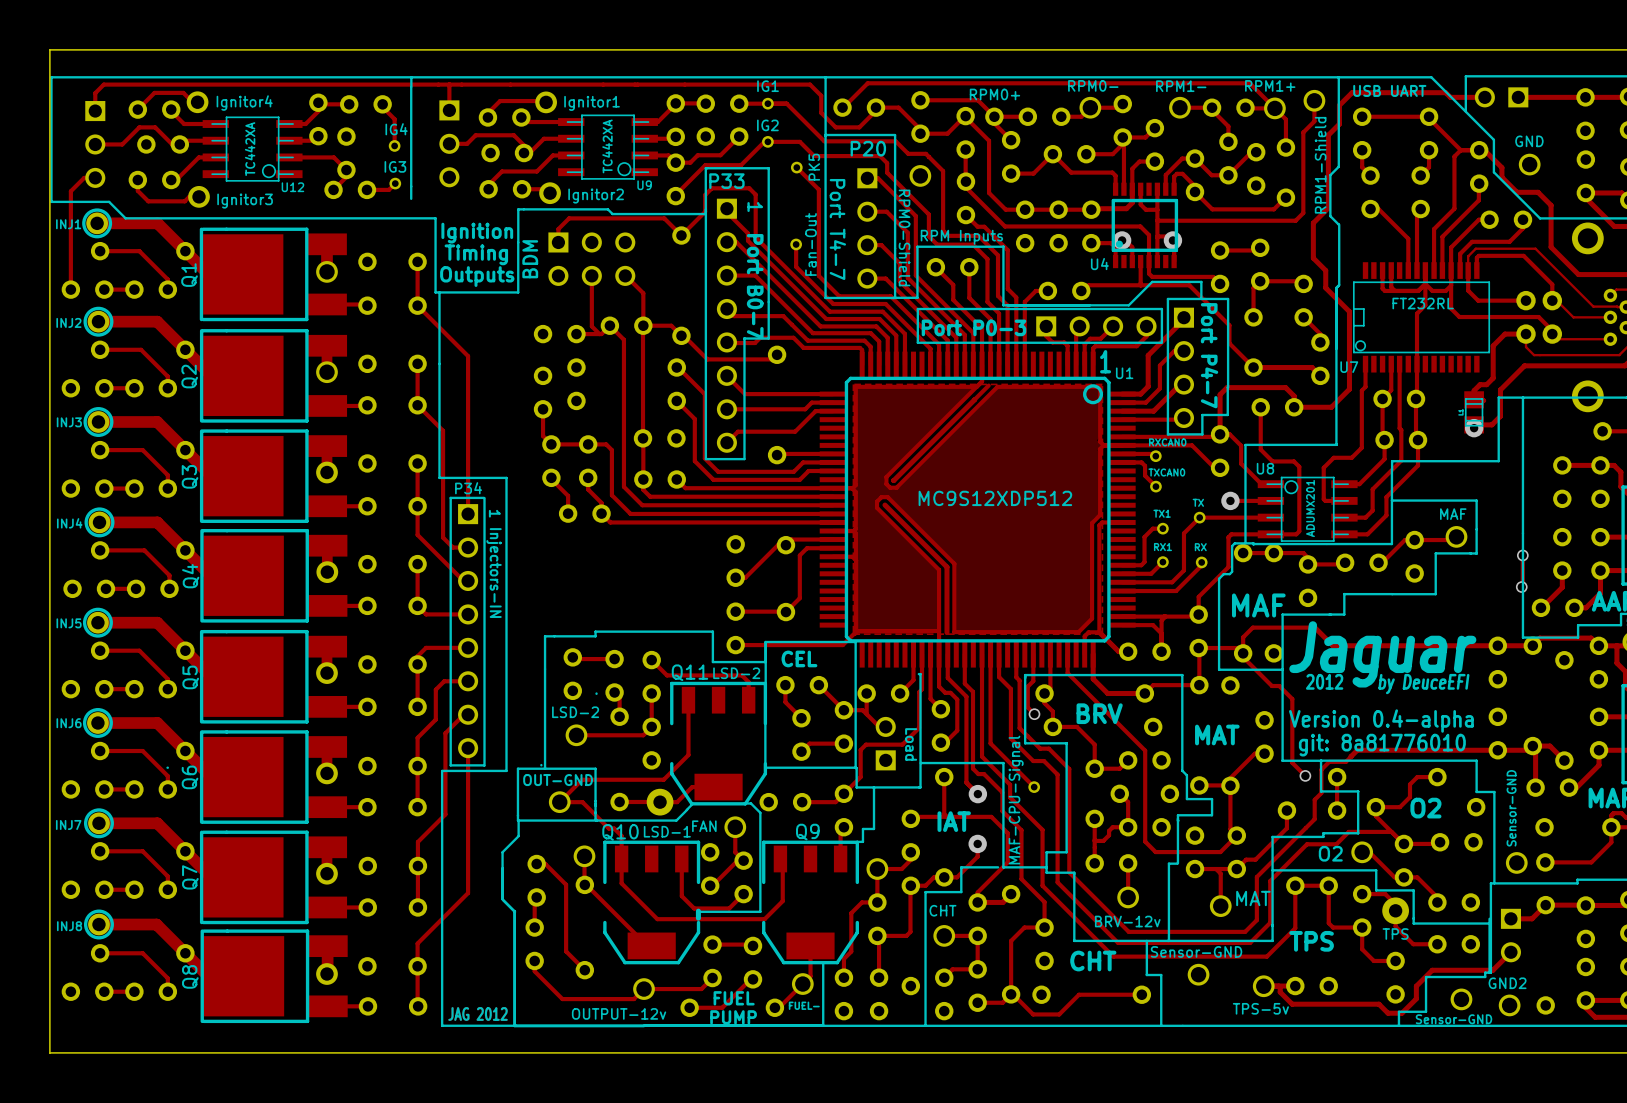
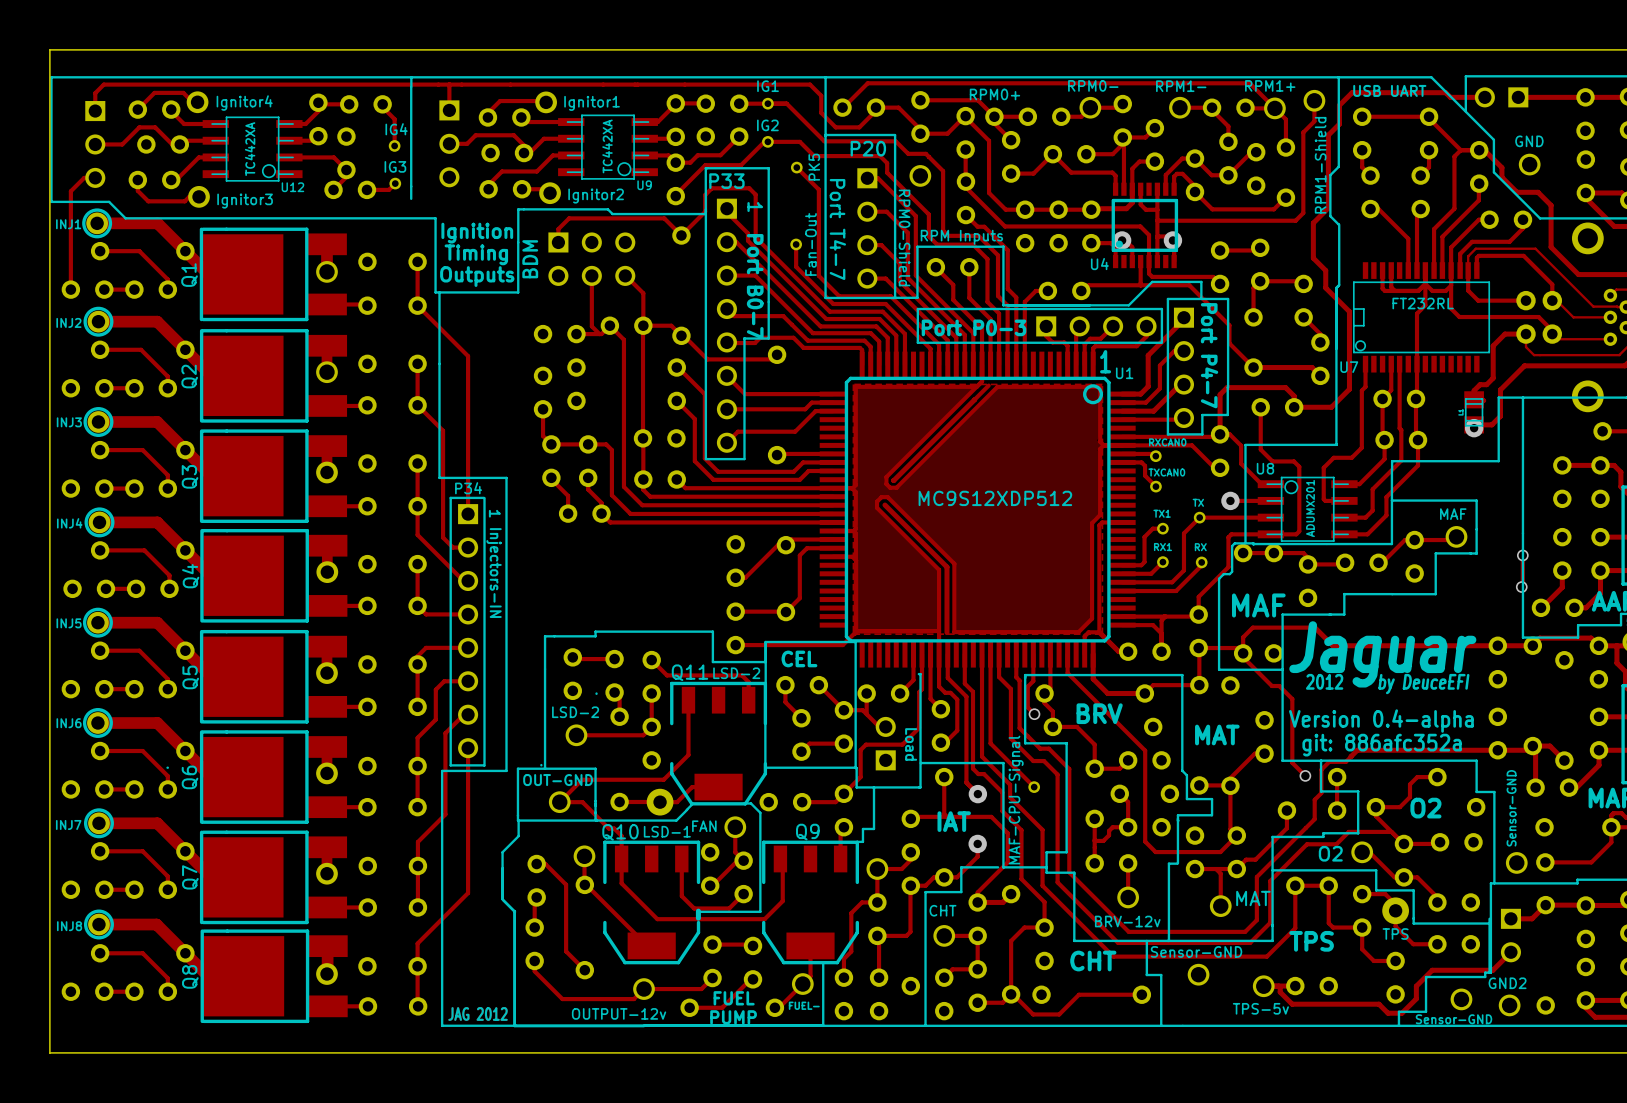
text: git: 8a81776010 (1382, 745) -> git: 886afc352a (1382, 745)

